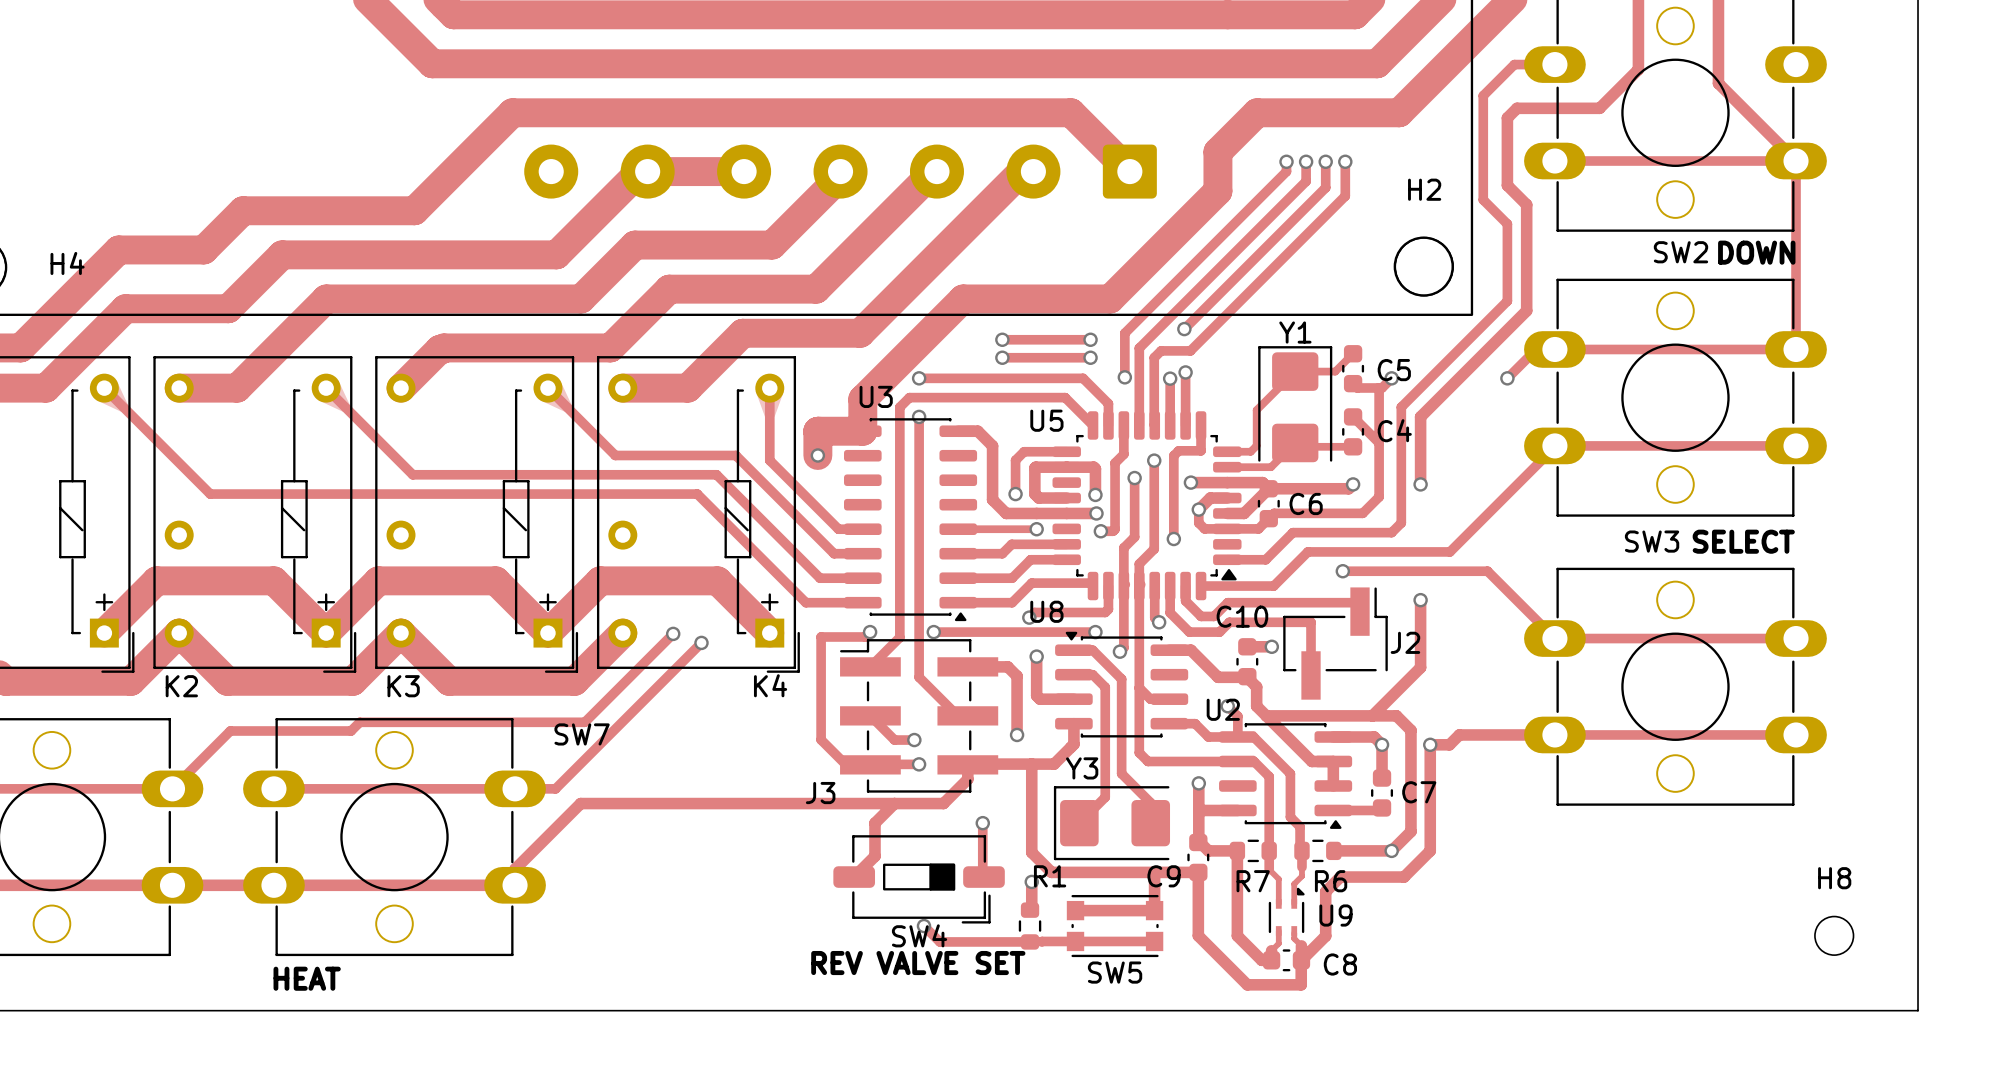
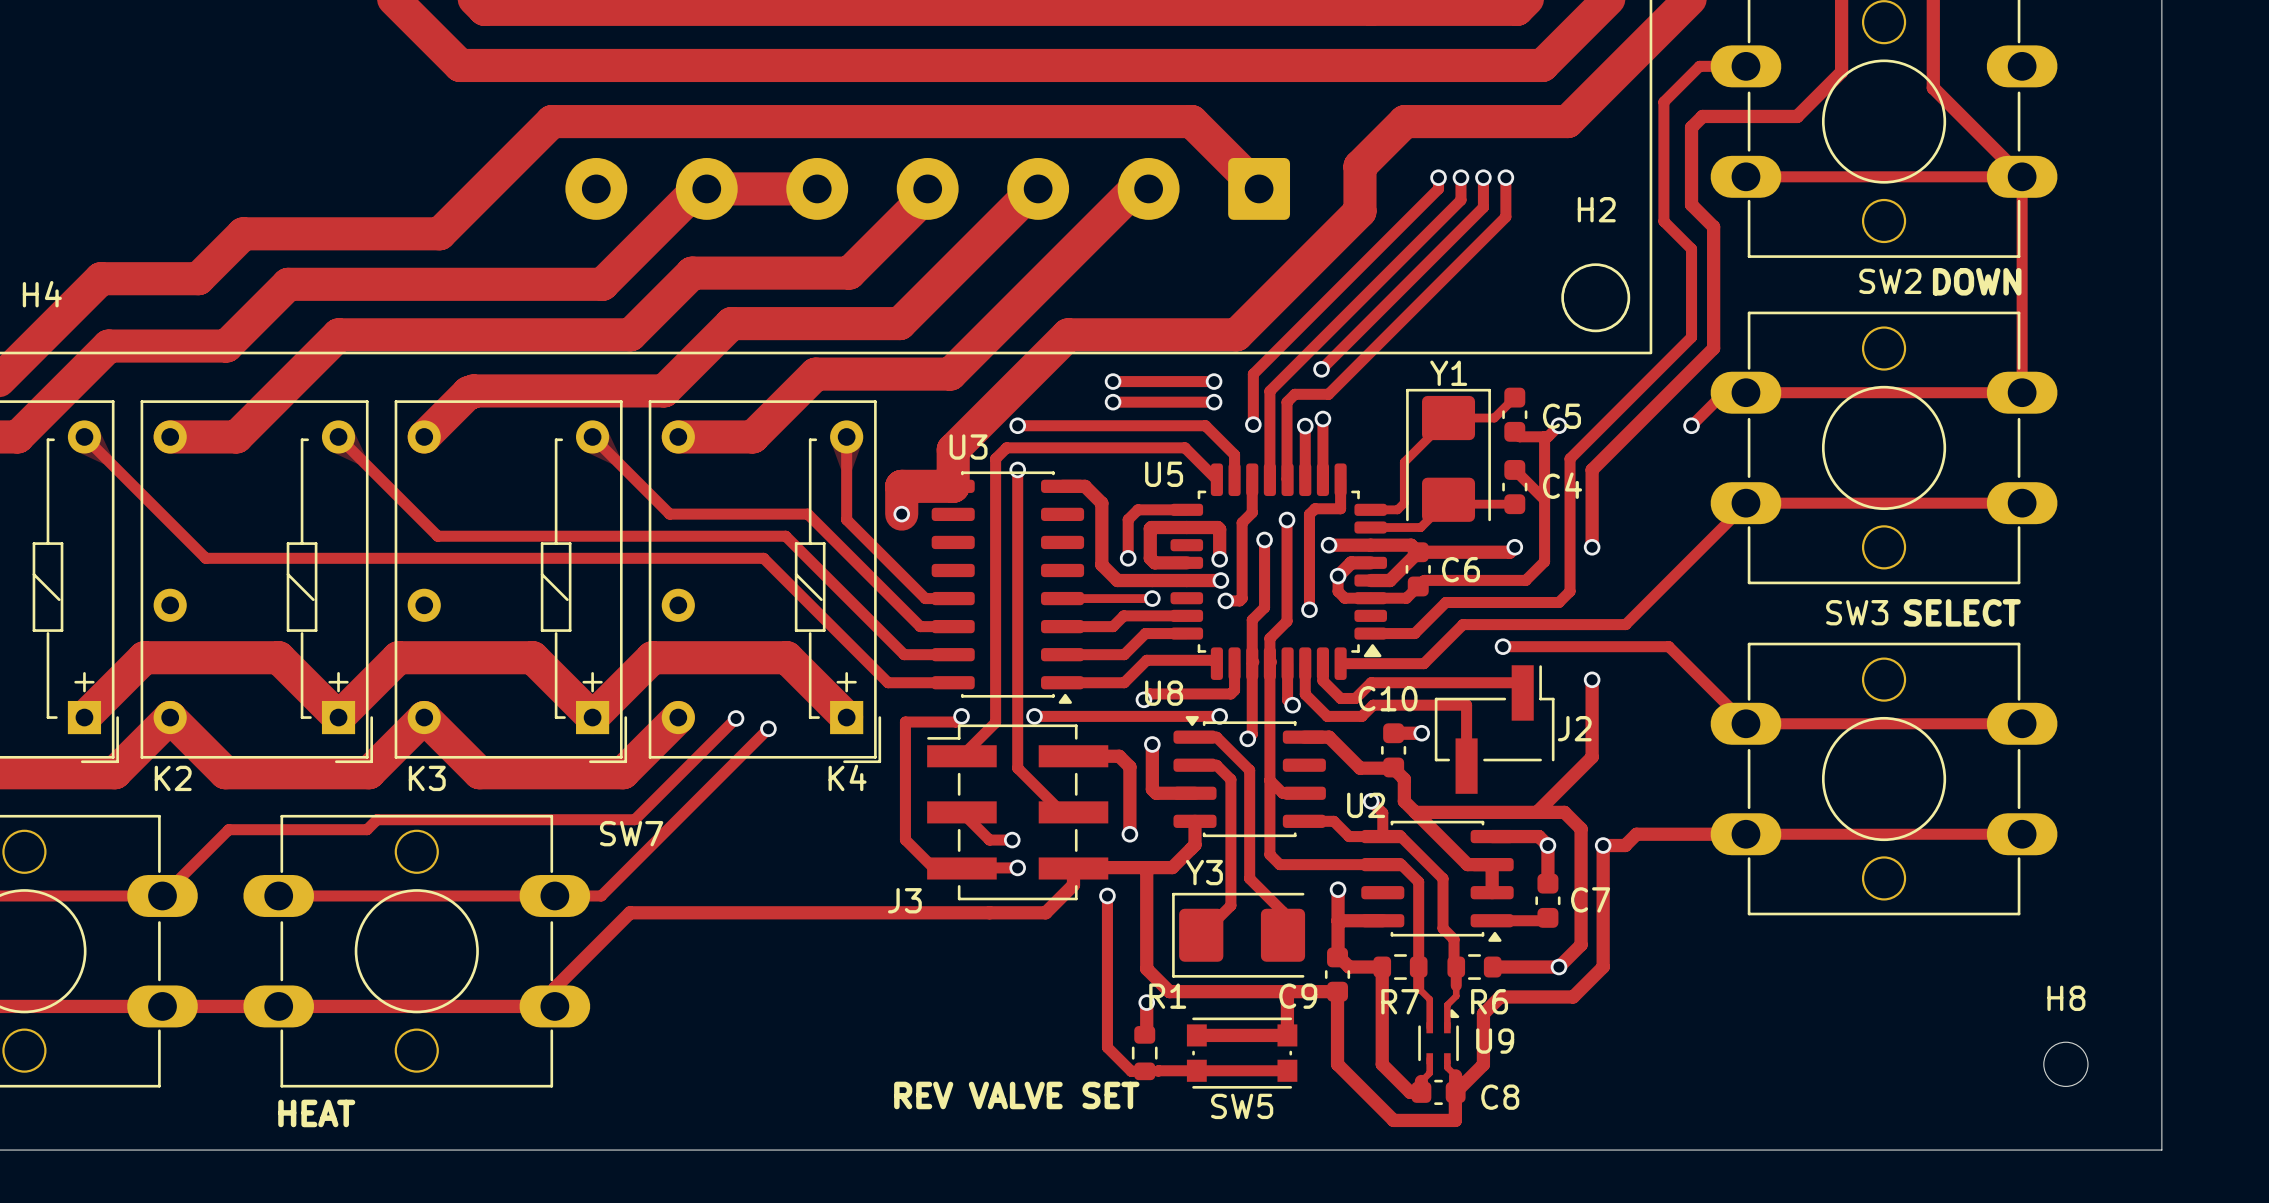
track: (894, 803) (874, 823) (874, 856) (854, 877) -> none
track: (982, 823) (983, 877) -> none
via position: (982, 823) -> (1107, 895)
SW4: (919, 879) -> none
track: (923, 926) (939, 941) (1018, 941) -> (1107, 895) (1107, 1047) (1131, 1071)
via: (923, 926) -> none

